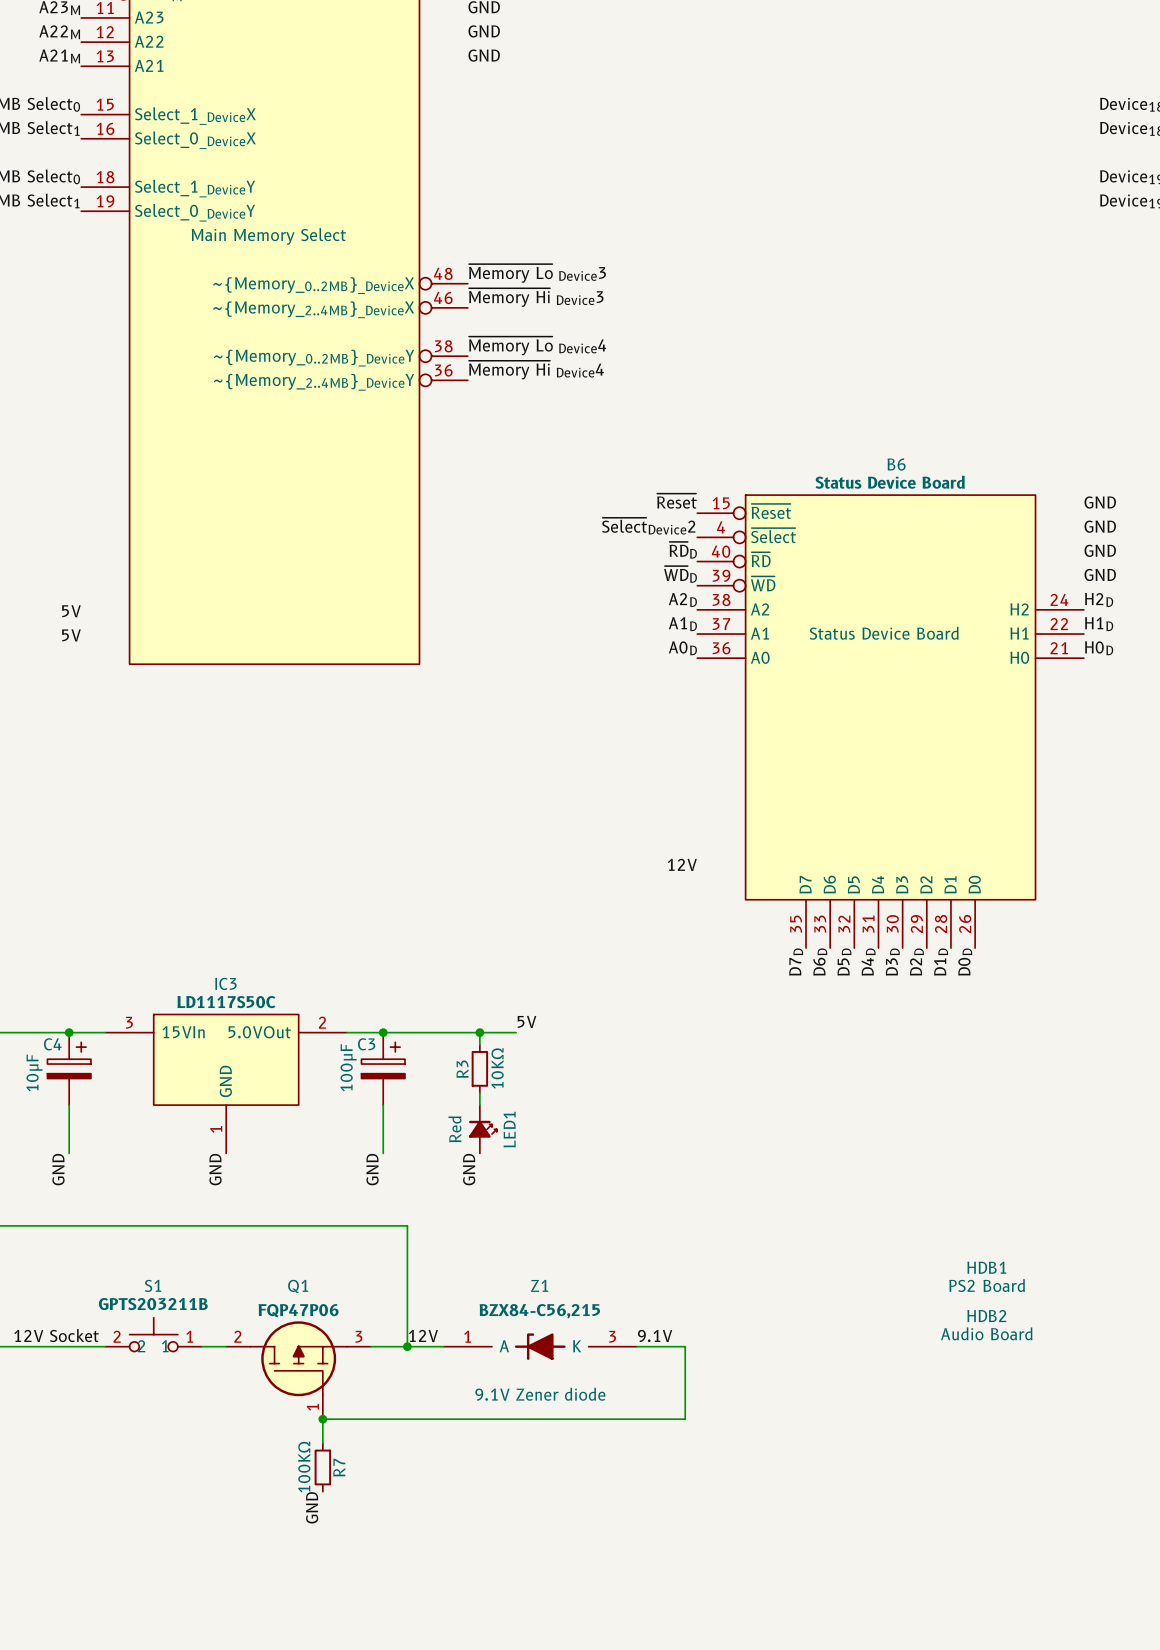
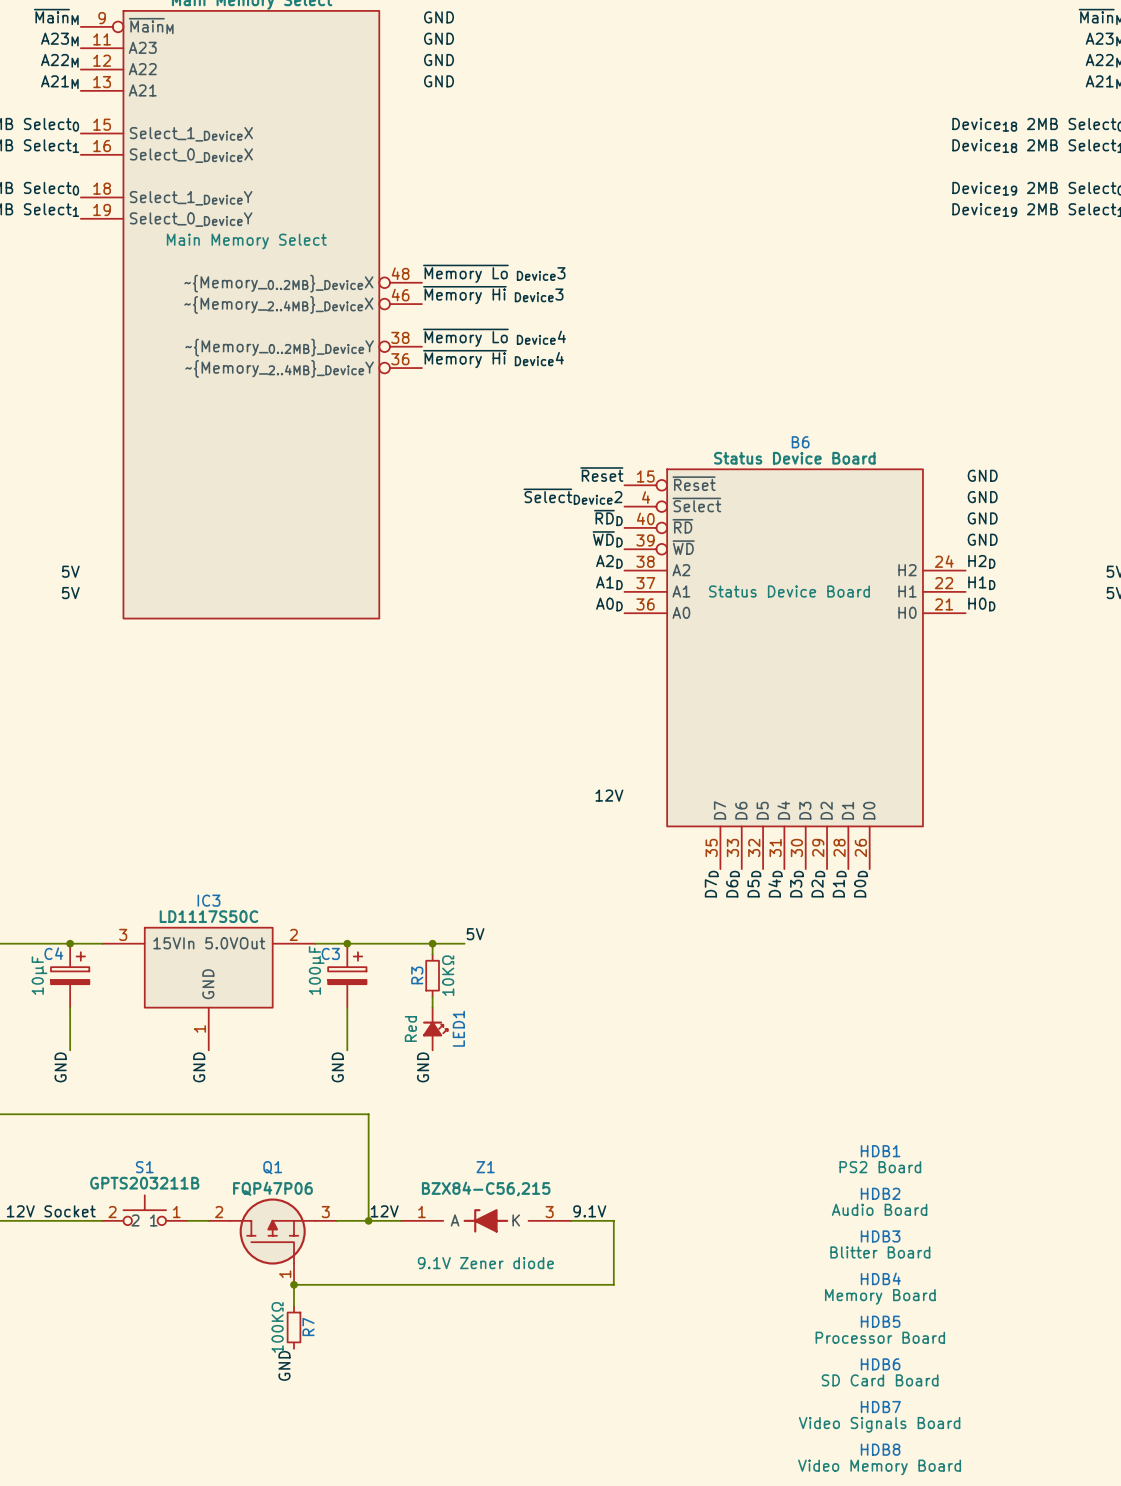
HDB3: none -> Blitter Board (880, 1244)
HDB4: none -> Memory Board (880, 1288)
HDB5: none -> Processor Board (880, 1329)
HDB6: none -> SD Card Board (880, 1372)
HDB7: none -> Video Signals Board (879, 1416)
HDB8: none -> Video Memory Board (879, 1459)

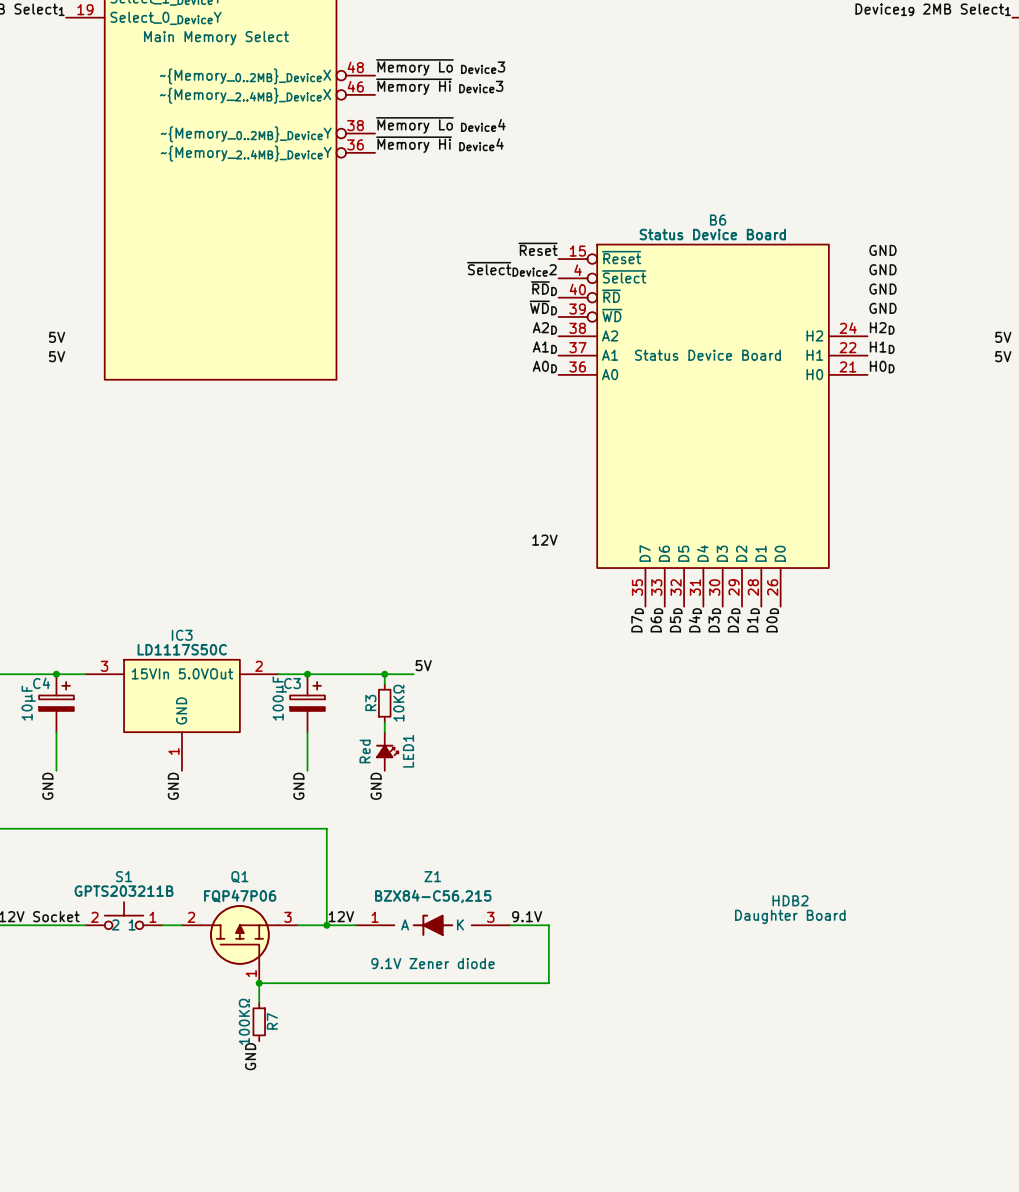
HDB1: PS2 Board (880, 1159) -> none
HDB2 value: Audio Board (879, 1209) -> Daughter Board (790, 916)
HDB3: Blitter Board (880, 1244) -> none
HDB4: Memory Board (880, 1288) -> none
HDB5: Processor Board (880, 1329) -> none
HDB6: SD Card Board (880, 1372) -> none
HDB7: Video Signals Board (879, 1416) -> none
HDB8: Video Memory Board (879, 1459) -> none

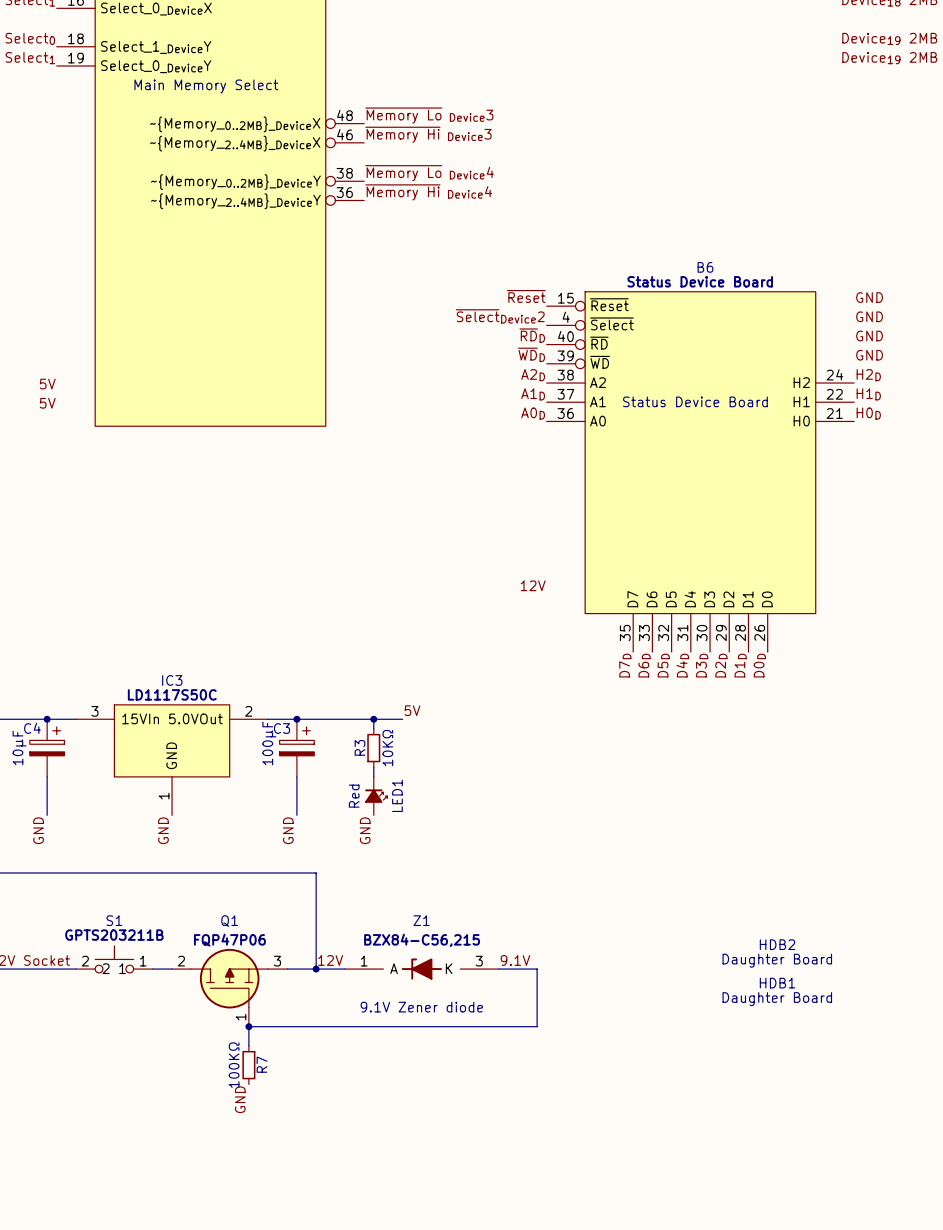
HDB1: none -> Daughter Board (777, 991)

